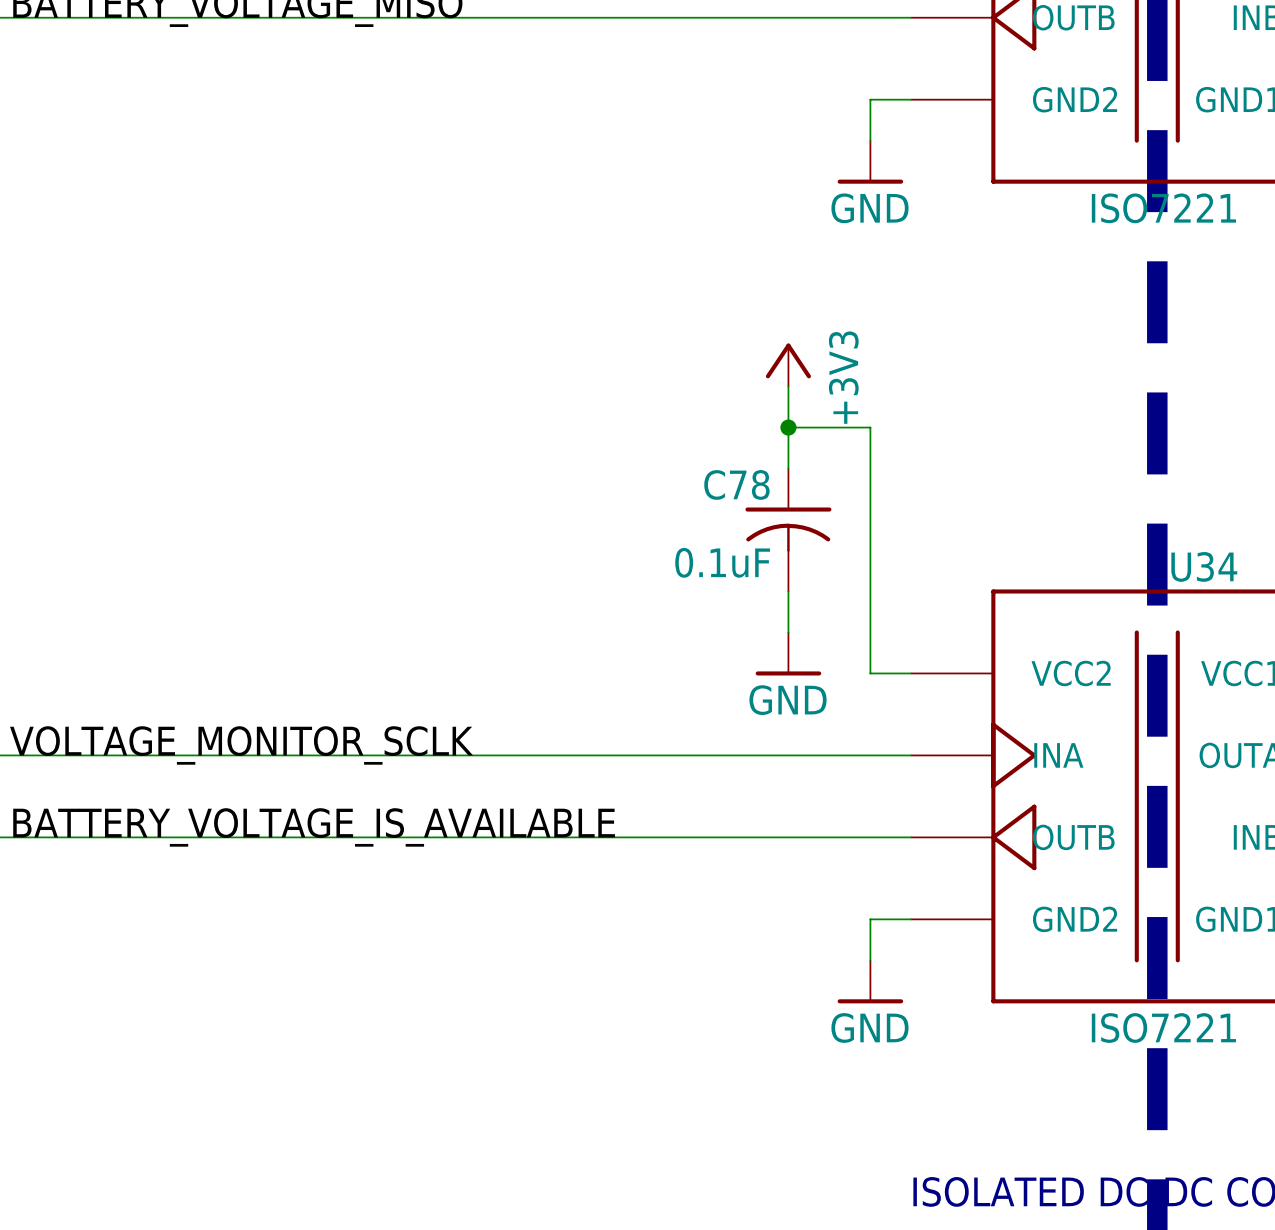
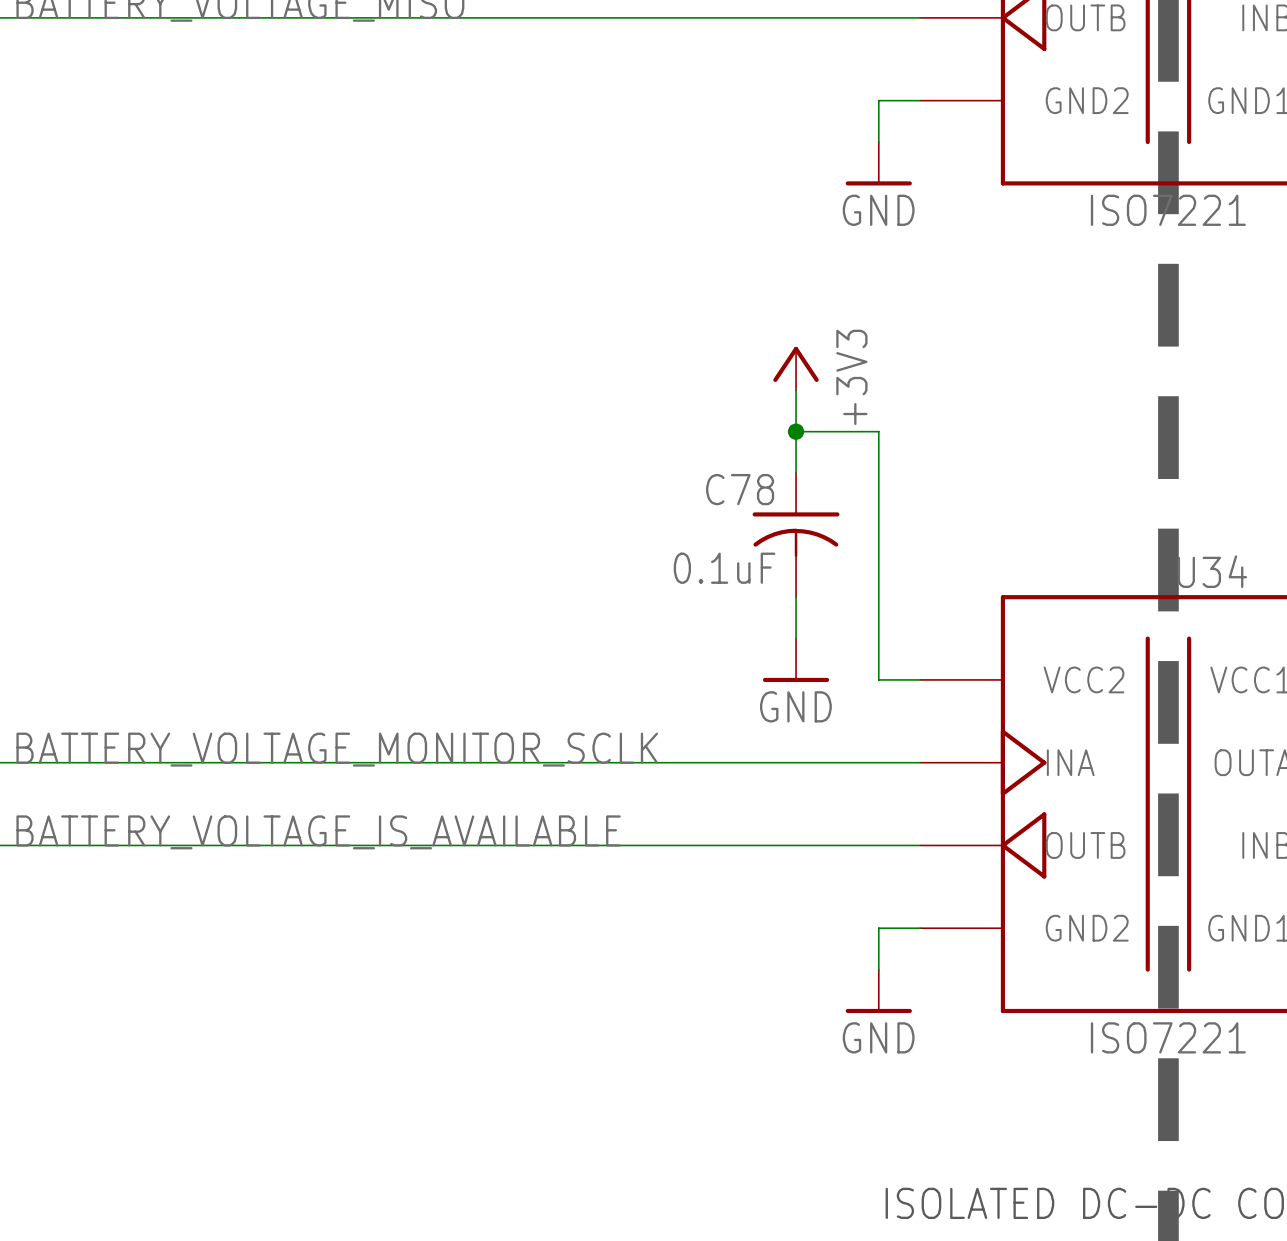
label: VOLTAGE_MONITOR_SCLK (241, 745) -> BATTERY_VOLTAGE_MONITOR_SCLK (337, 749)

